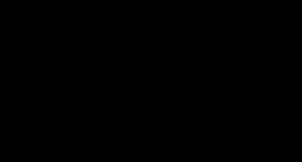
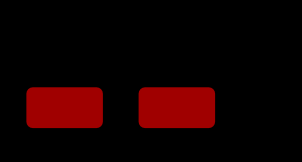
part: none -> (120, 107)

